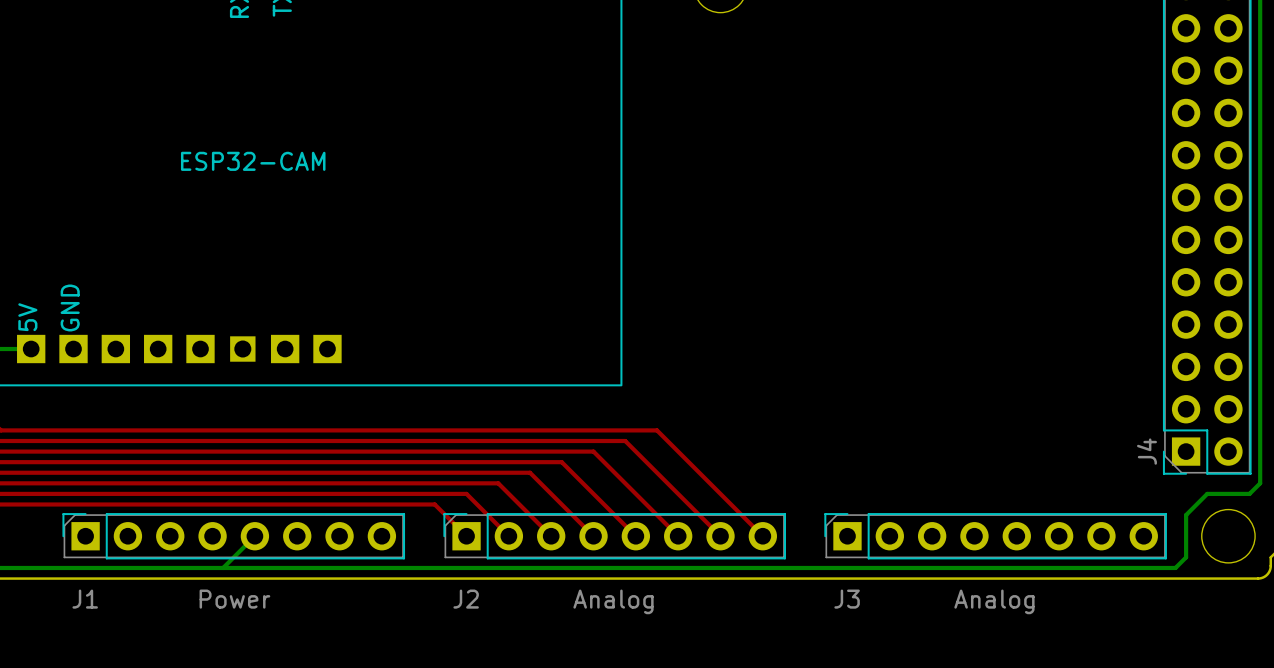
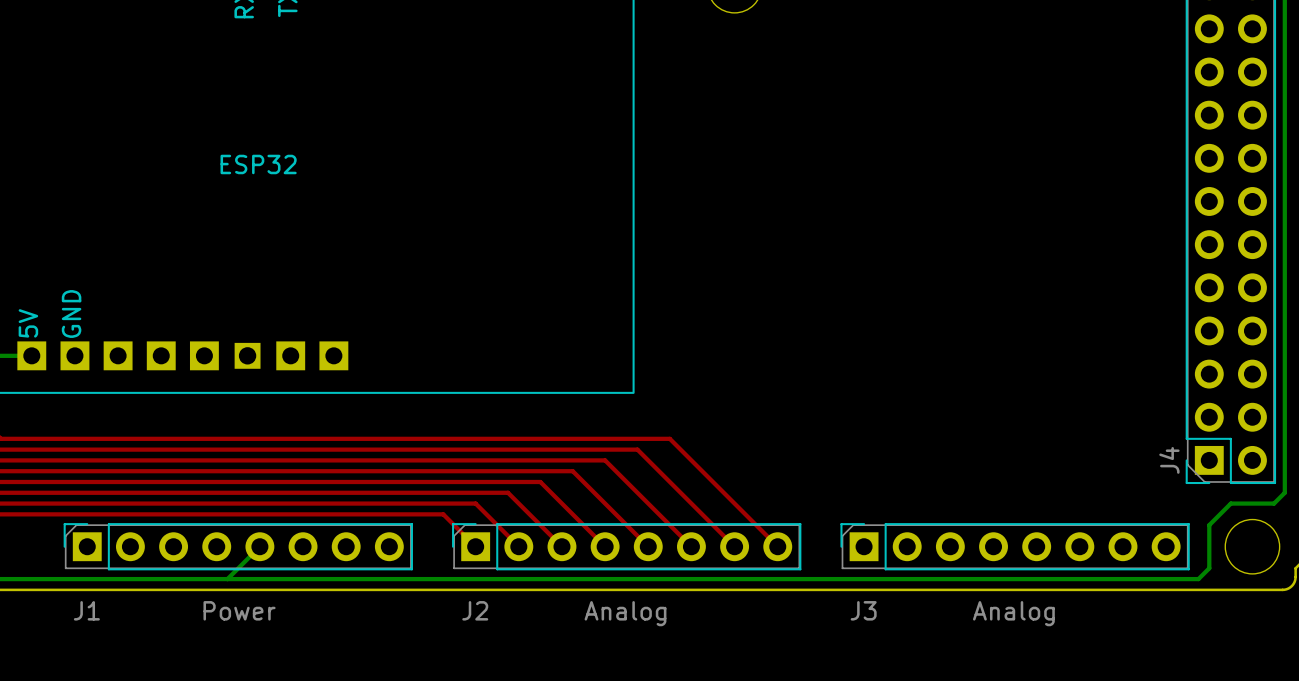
part value: ESP32-CAM (253, 161) -> ESP32 (258, 164)

